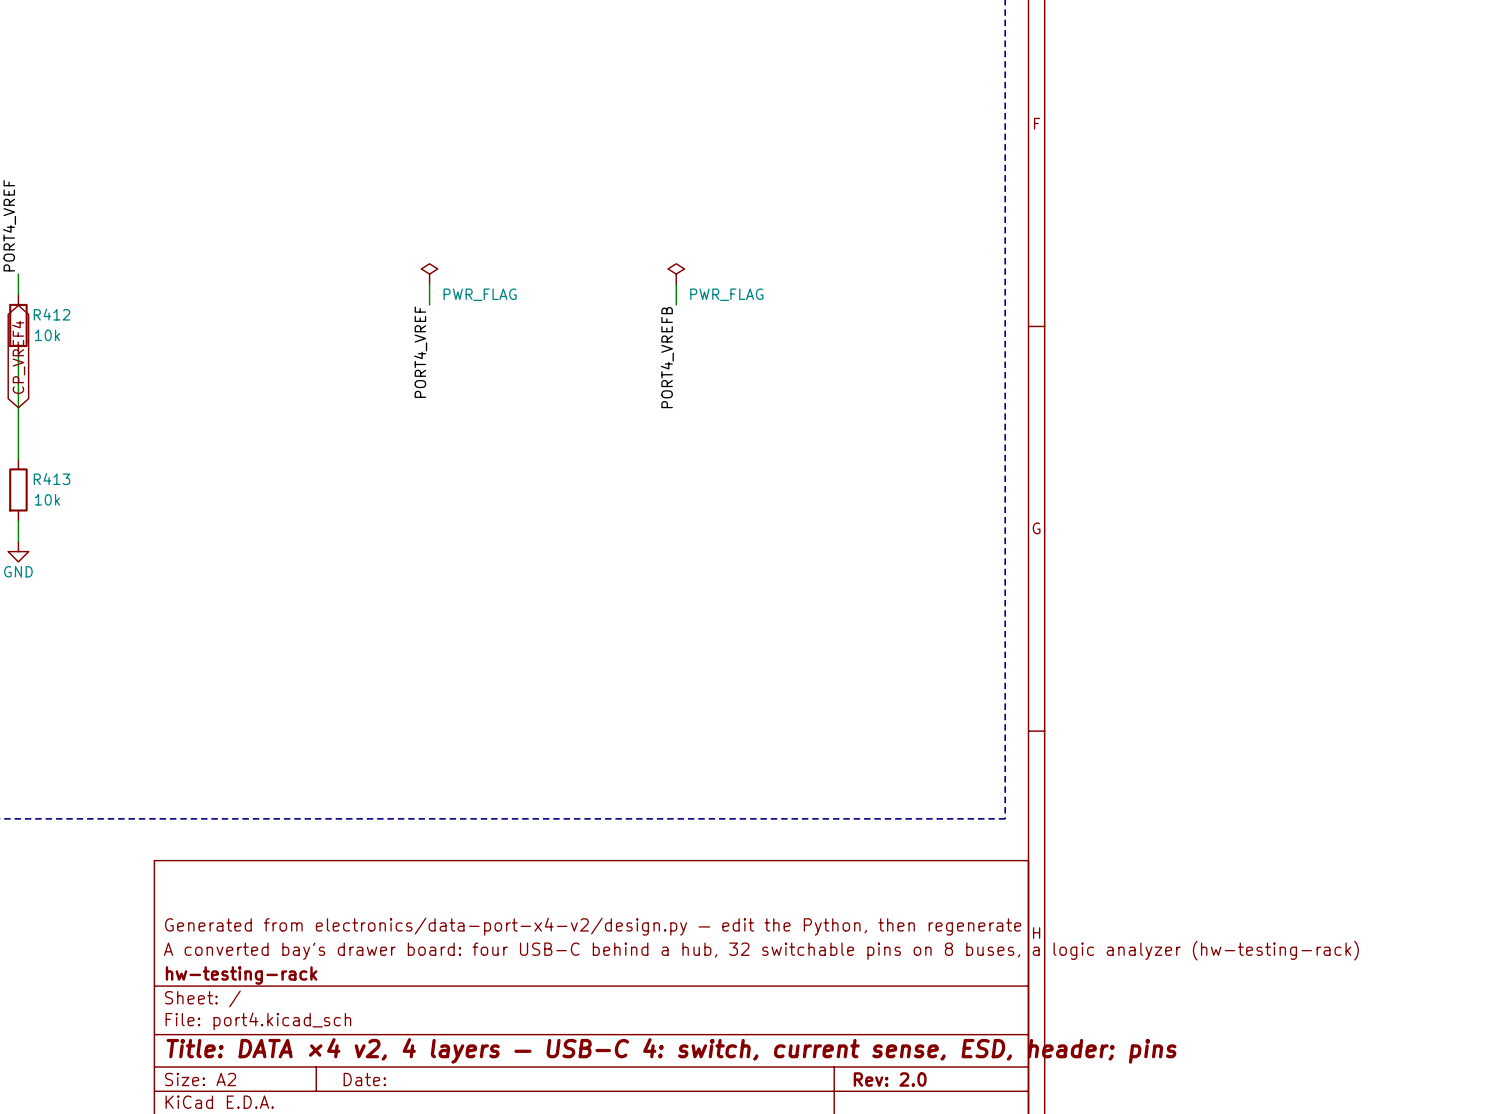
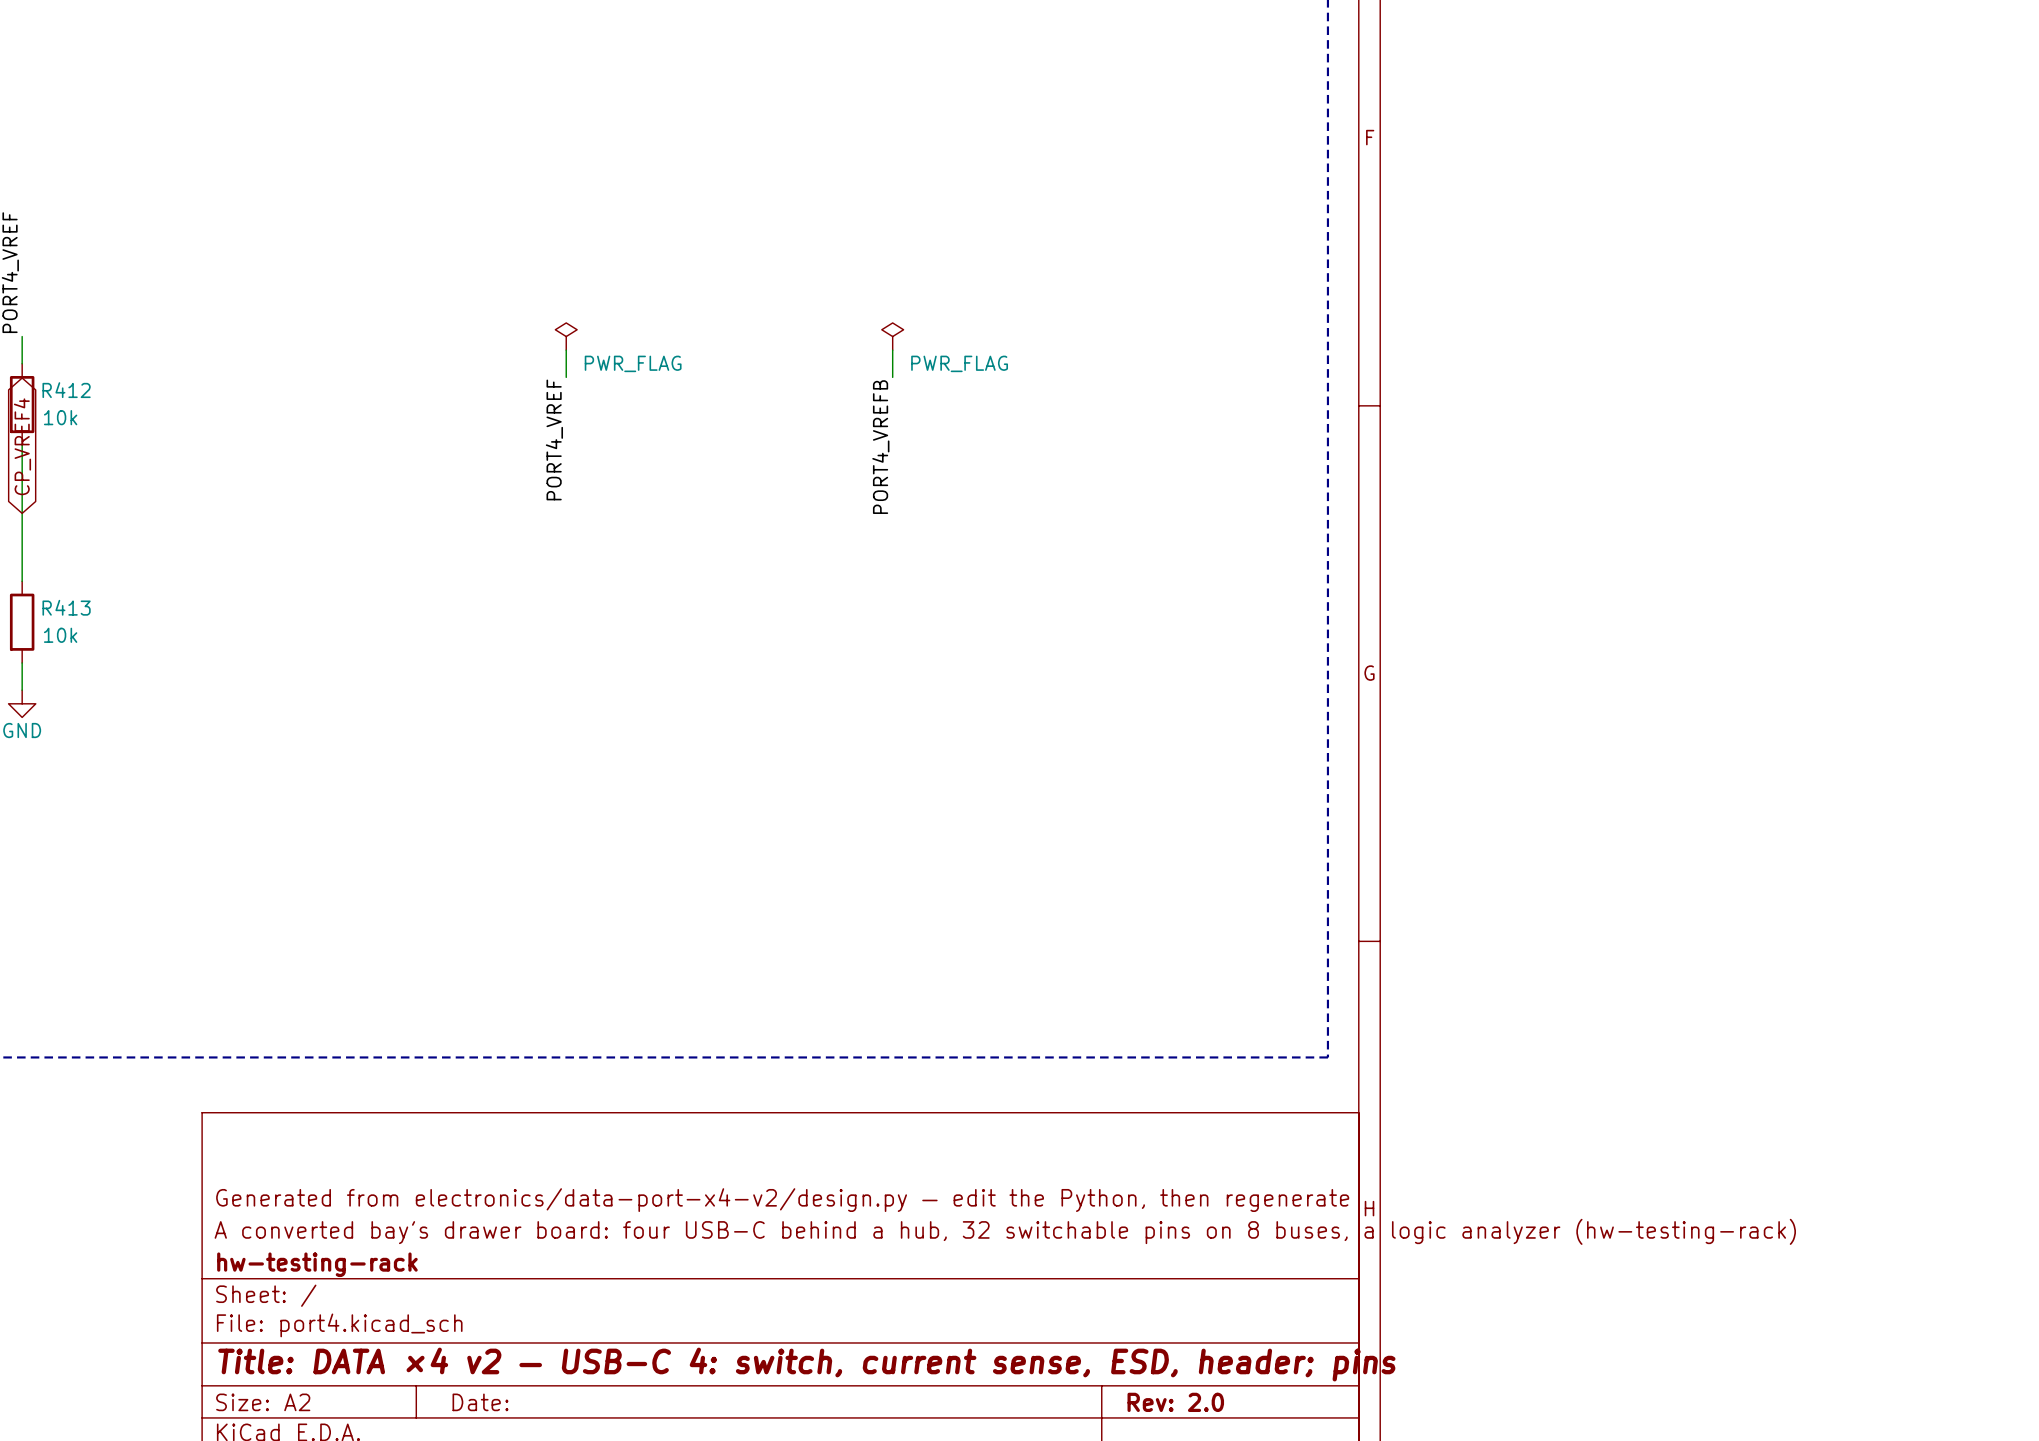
title block: Title: DATA ×4 v2, 4 layers — USB-C 4: switch, current sense, ESD, header; pins (671, 1050) -> Title: DATA ×4 v2 — USB-C 4: switch, current sense, ESD, header; pins (806, 1364)

